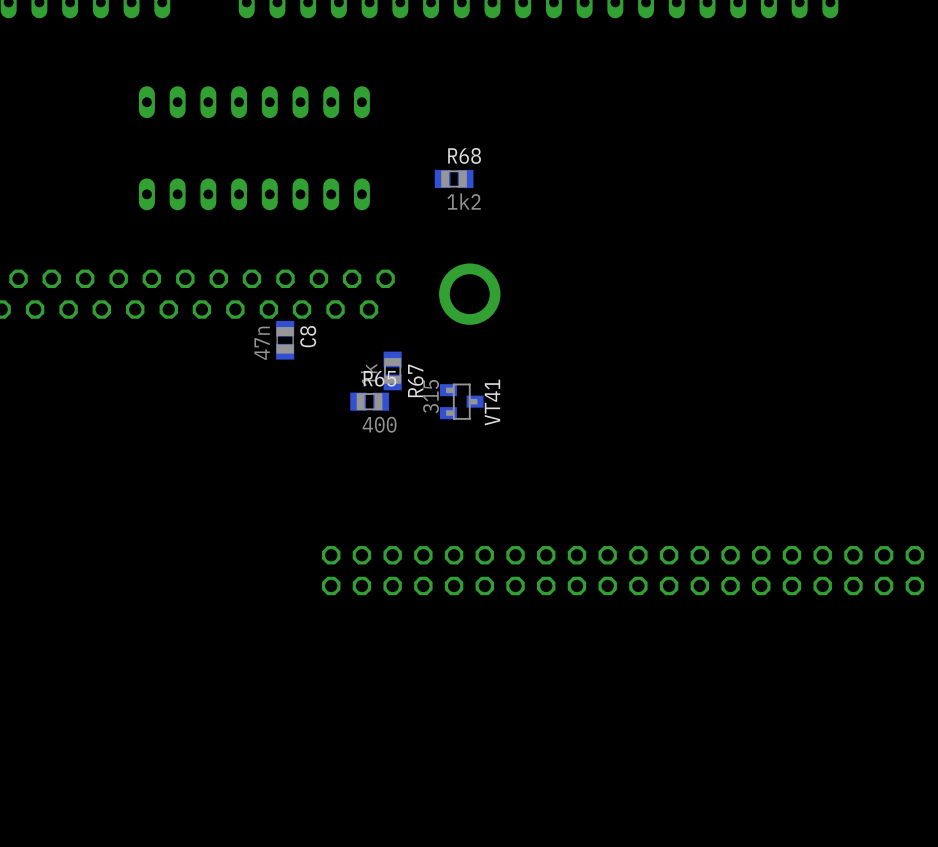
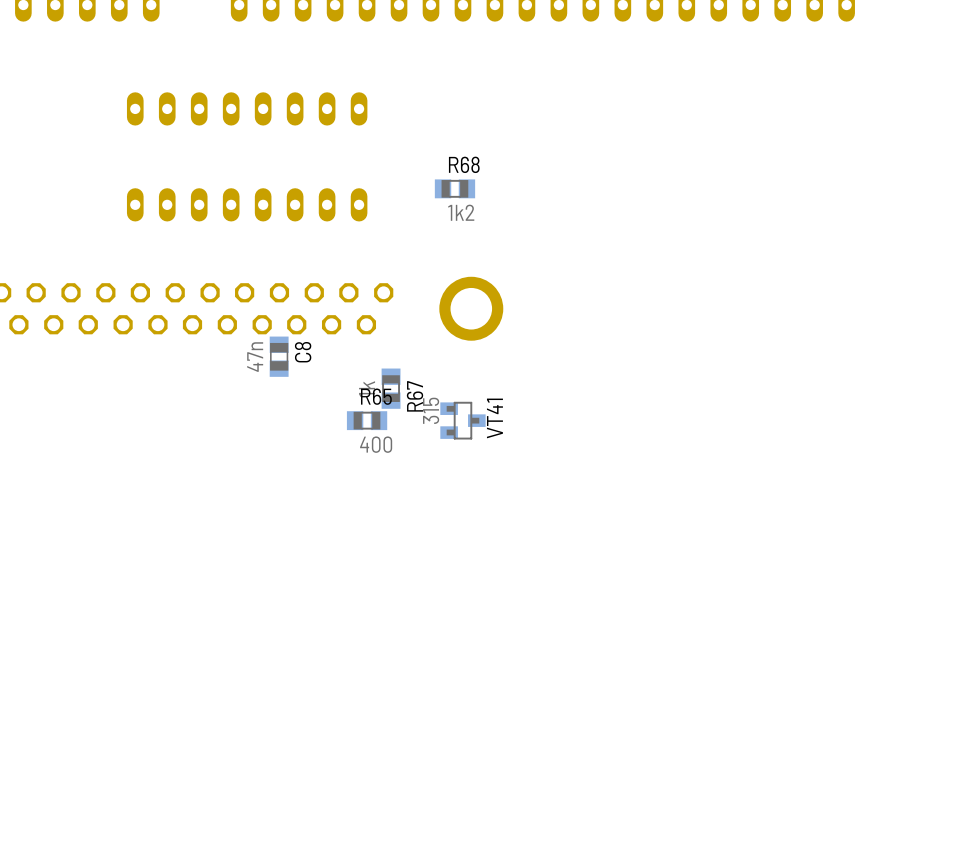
part: (623, 570) -> none

